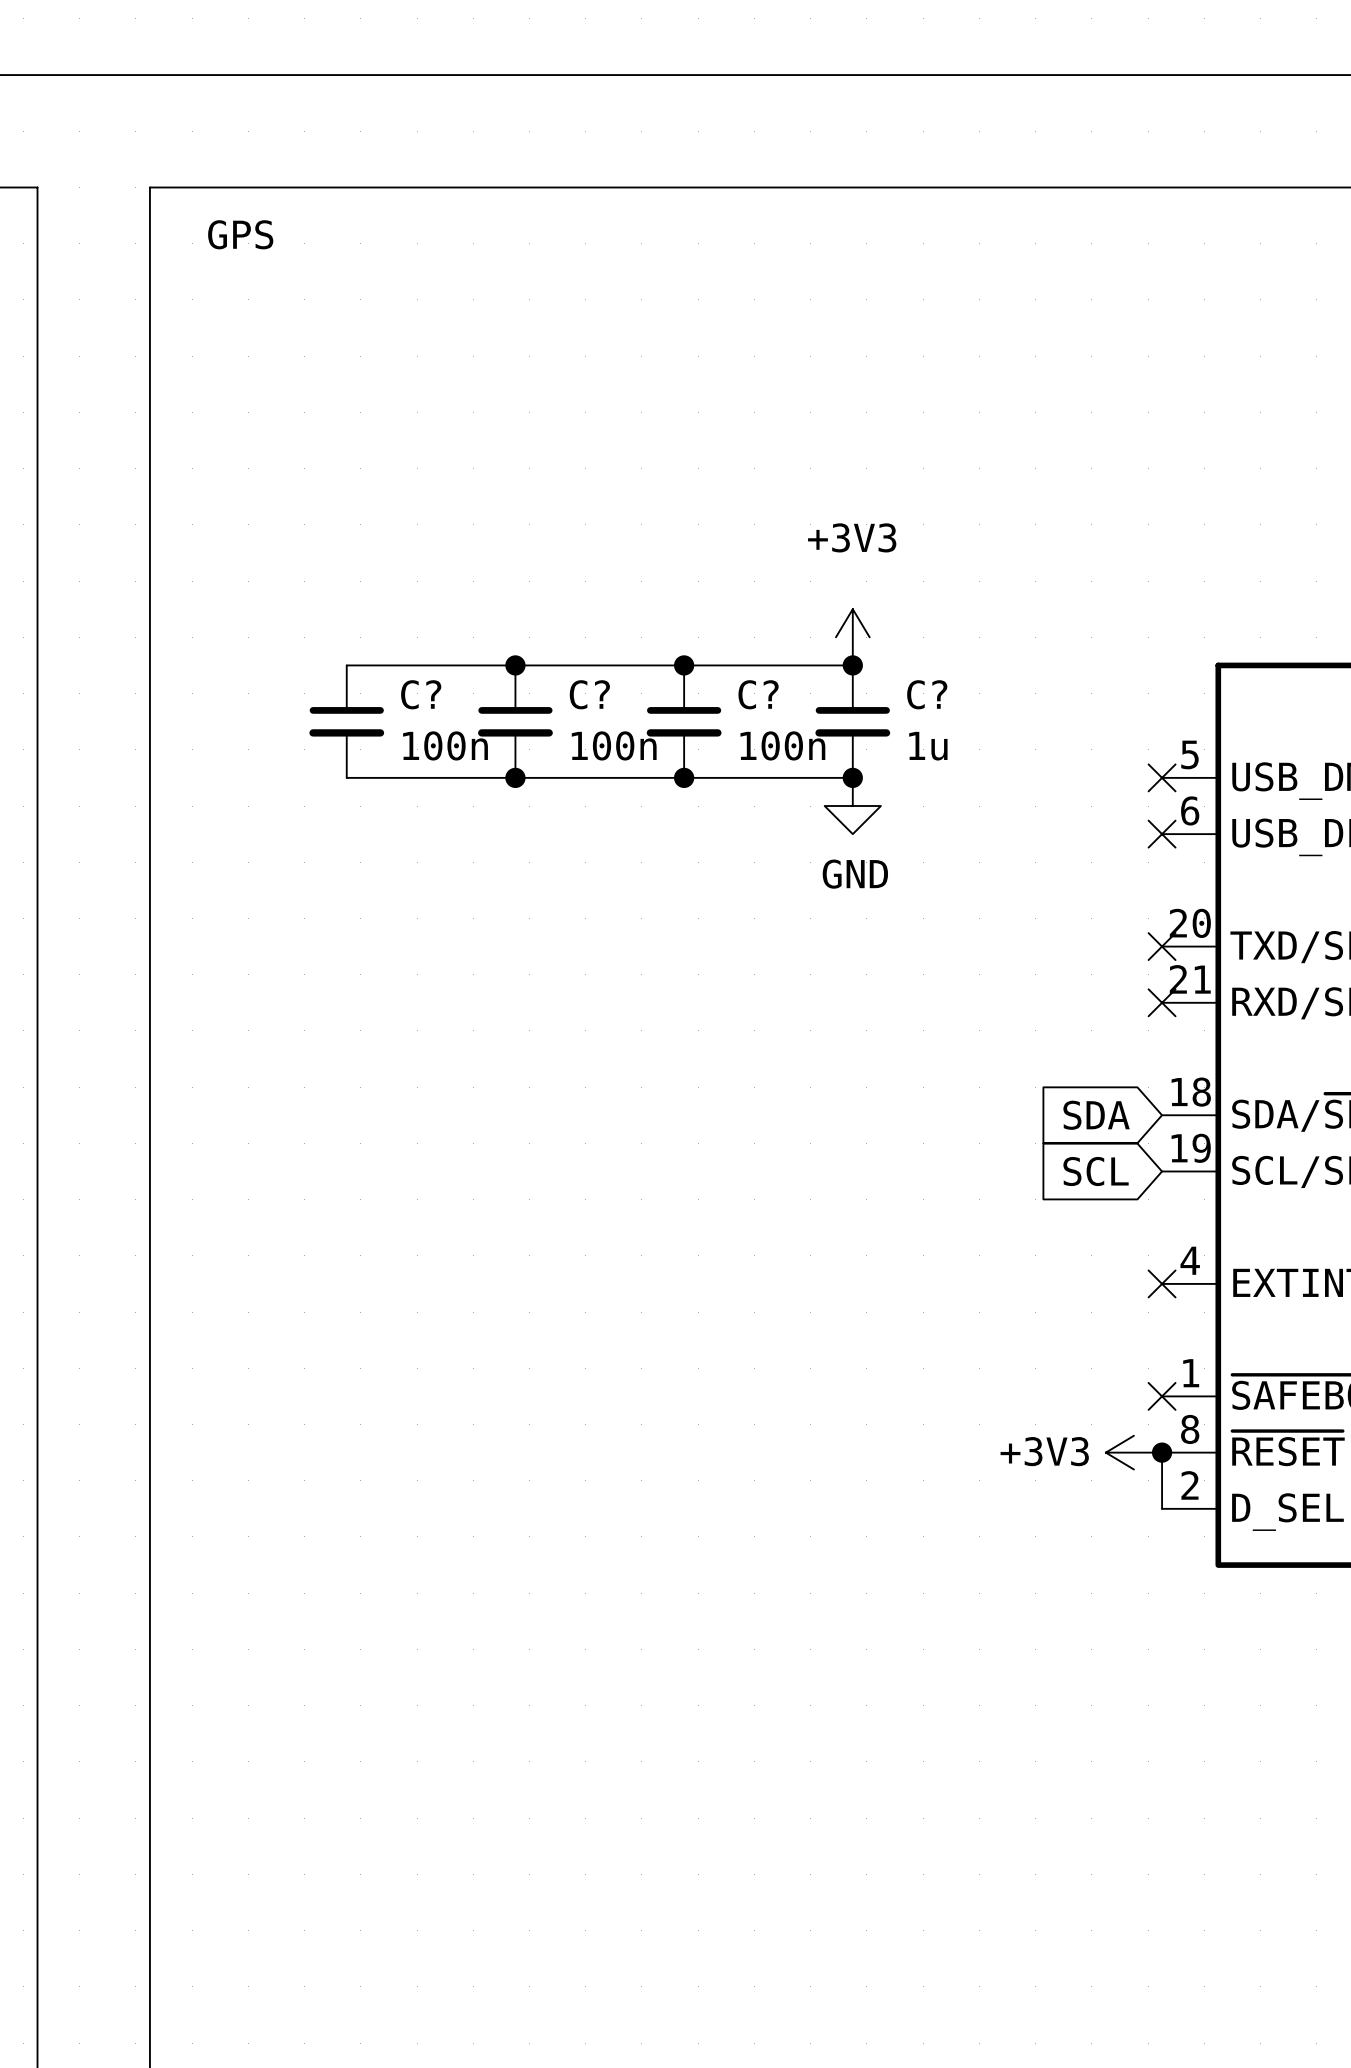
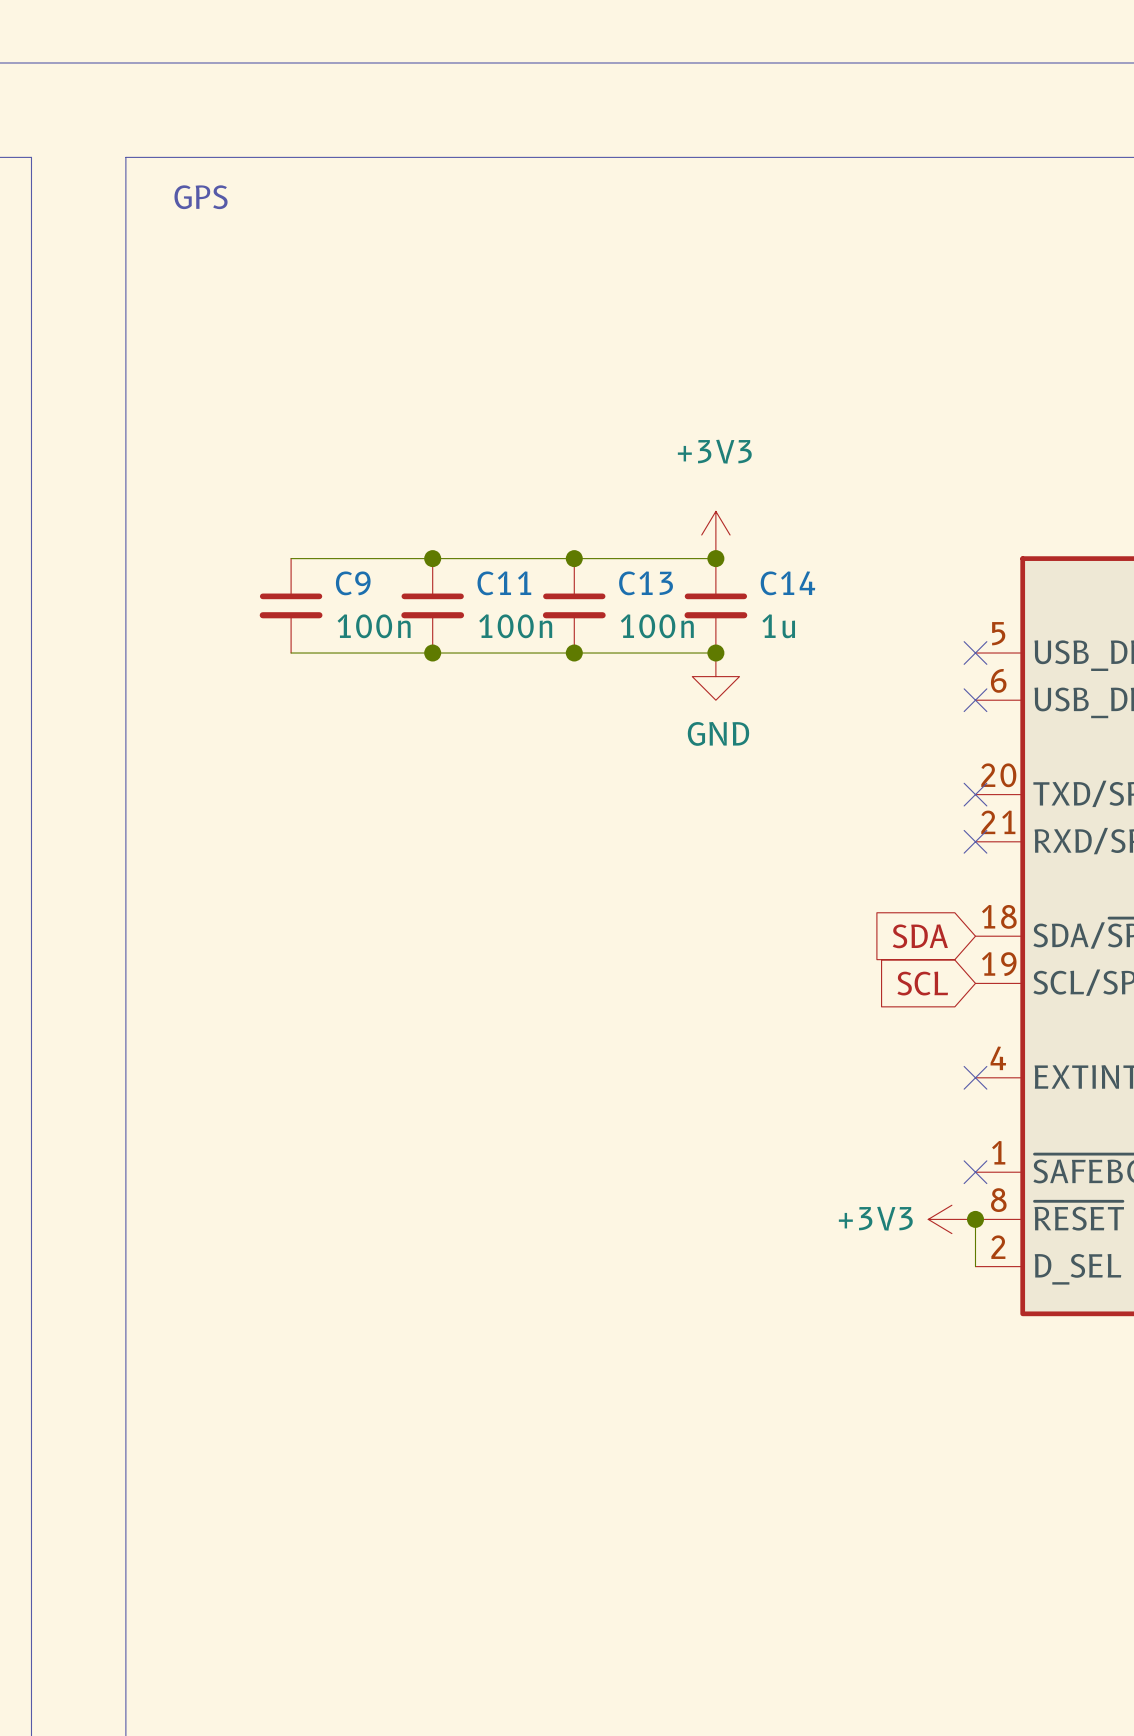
C? name: C? (421, 694) -> C9 (353, 583)
C? name: C? (589, 694) -> C11 (504, 583)
C? name: C? (758, 694) -> C13 (646, 583)
C? name: C? (927, 694) -> C14 (787, 583)

